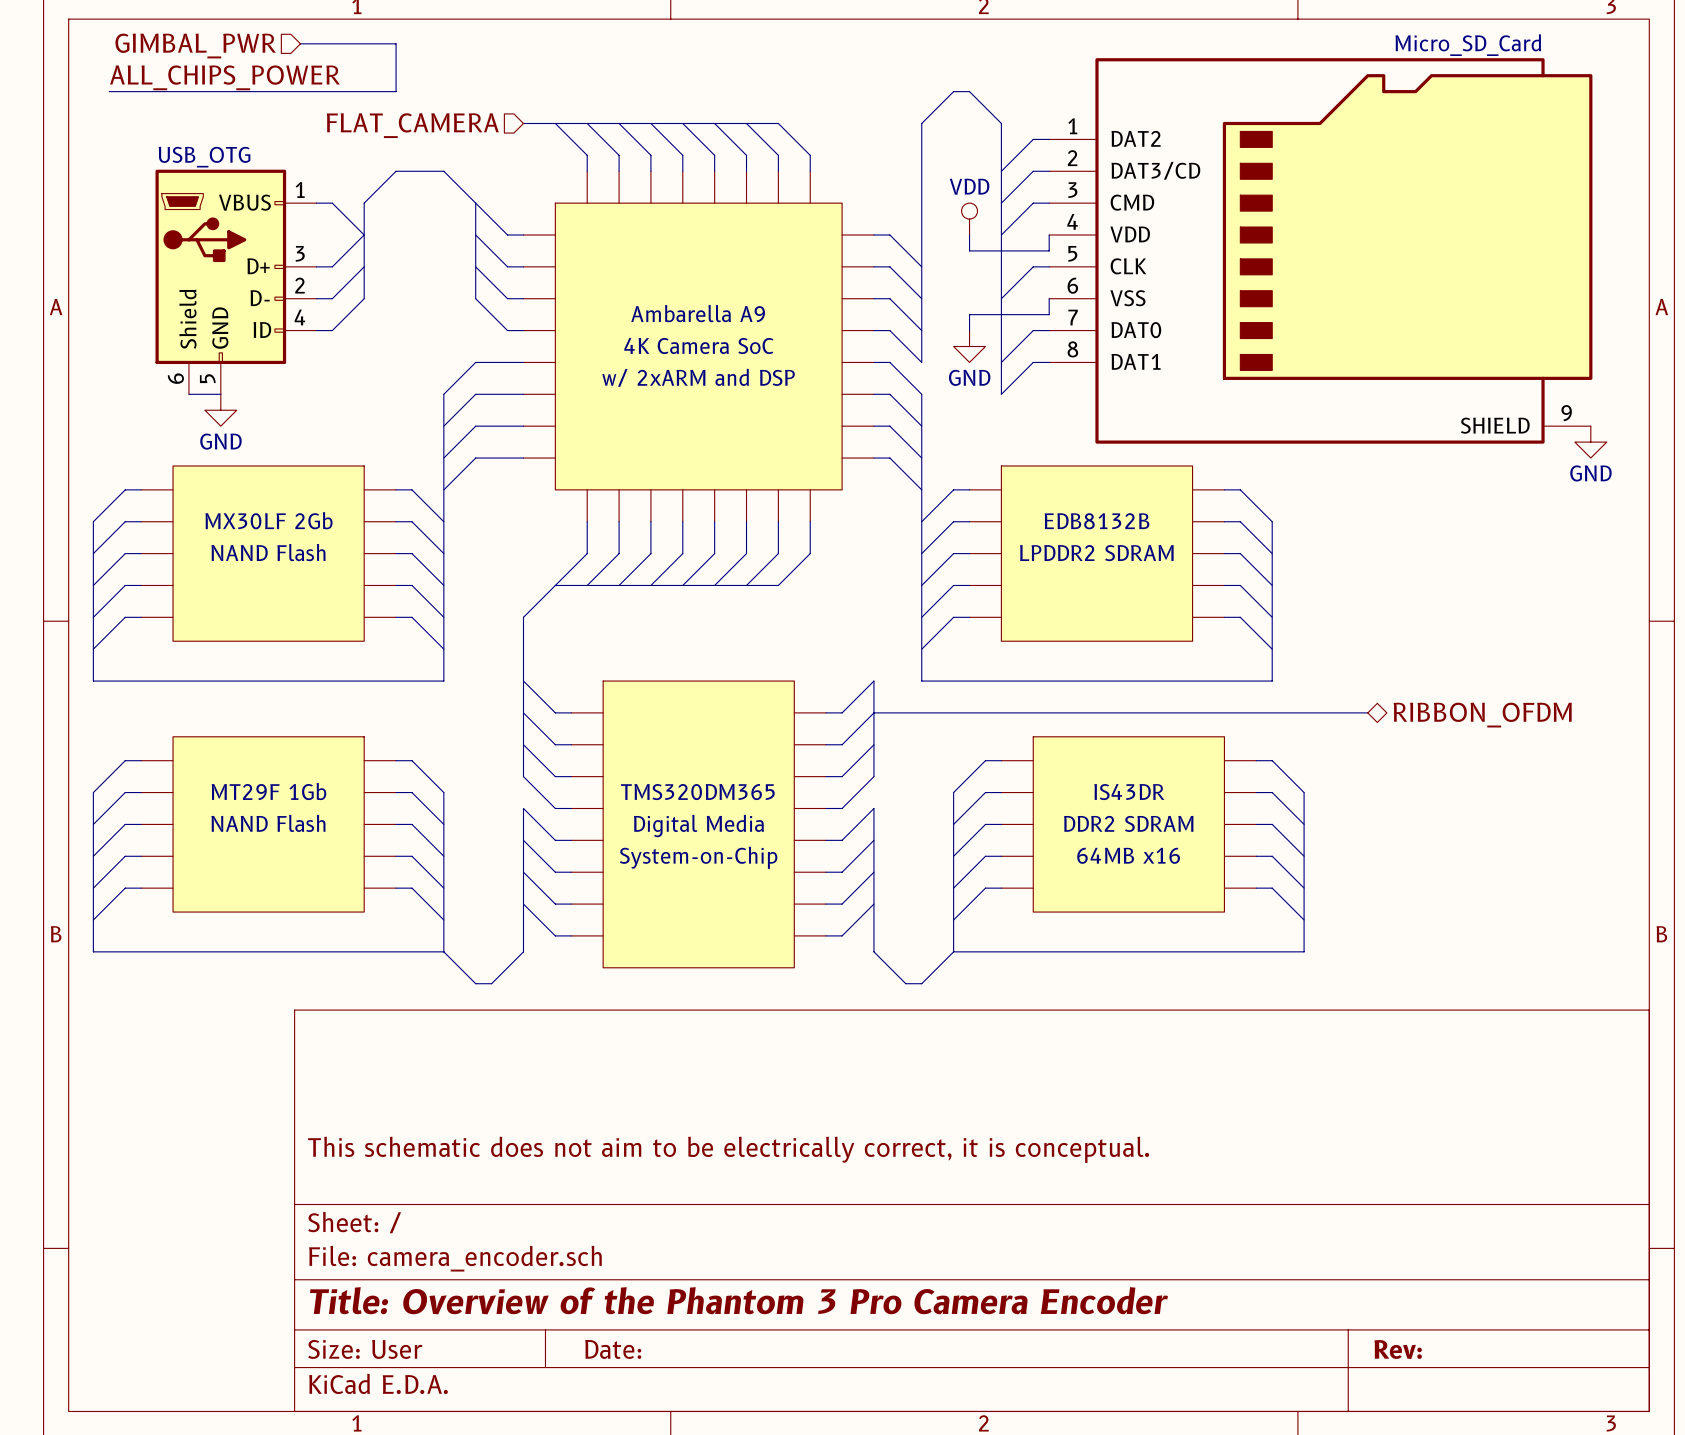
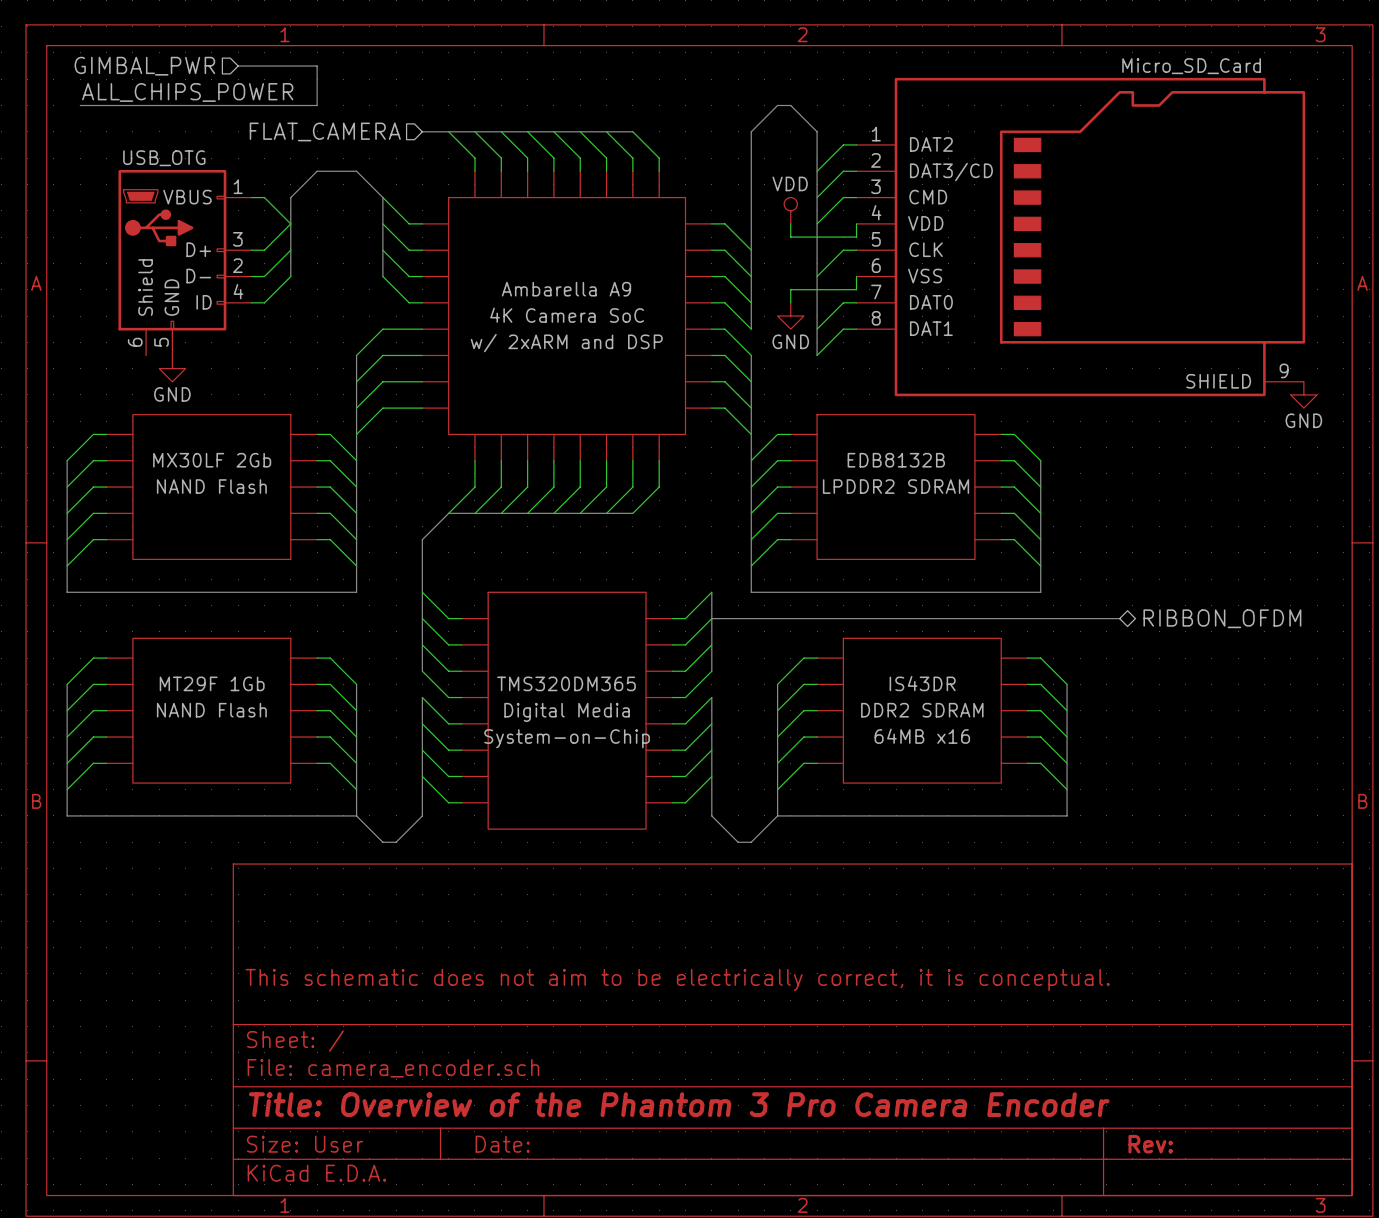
wire: (188, 394) (220, 394) -> none

